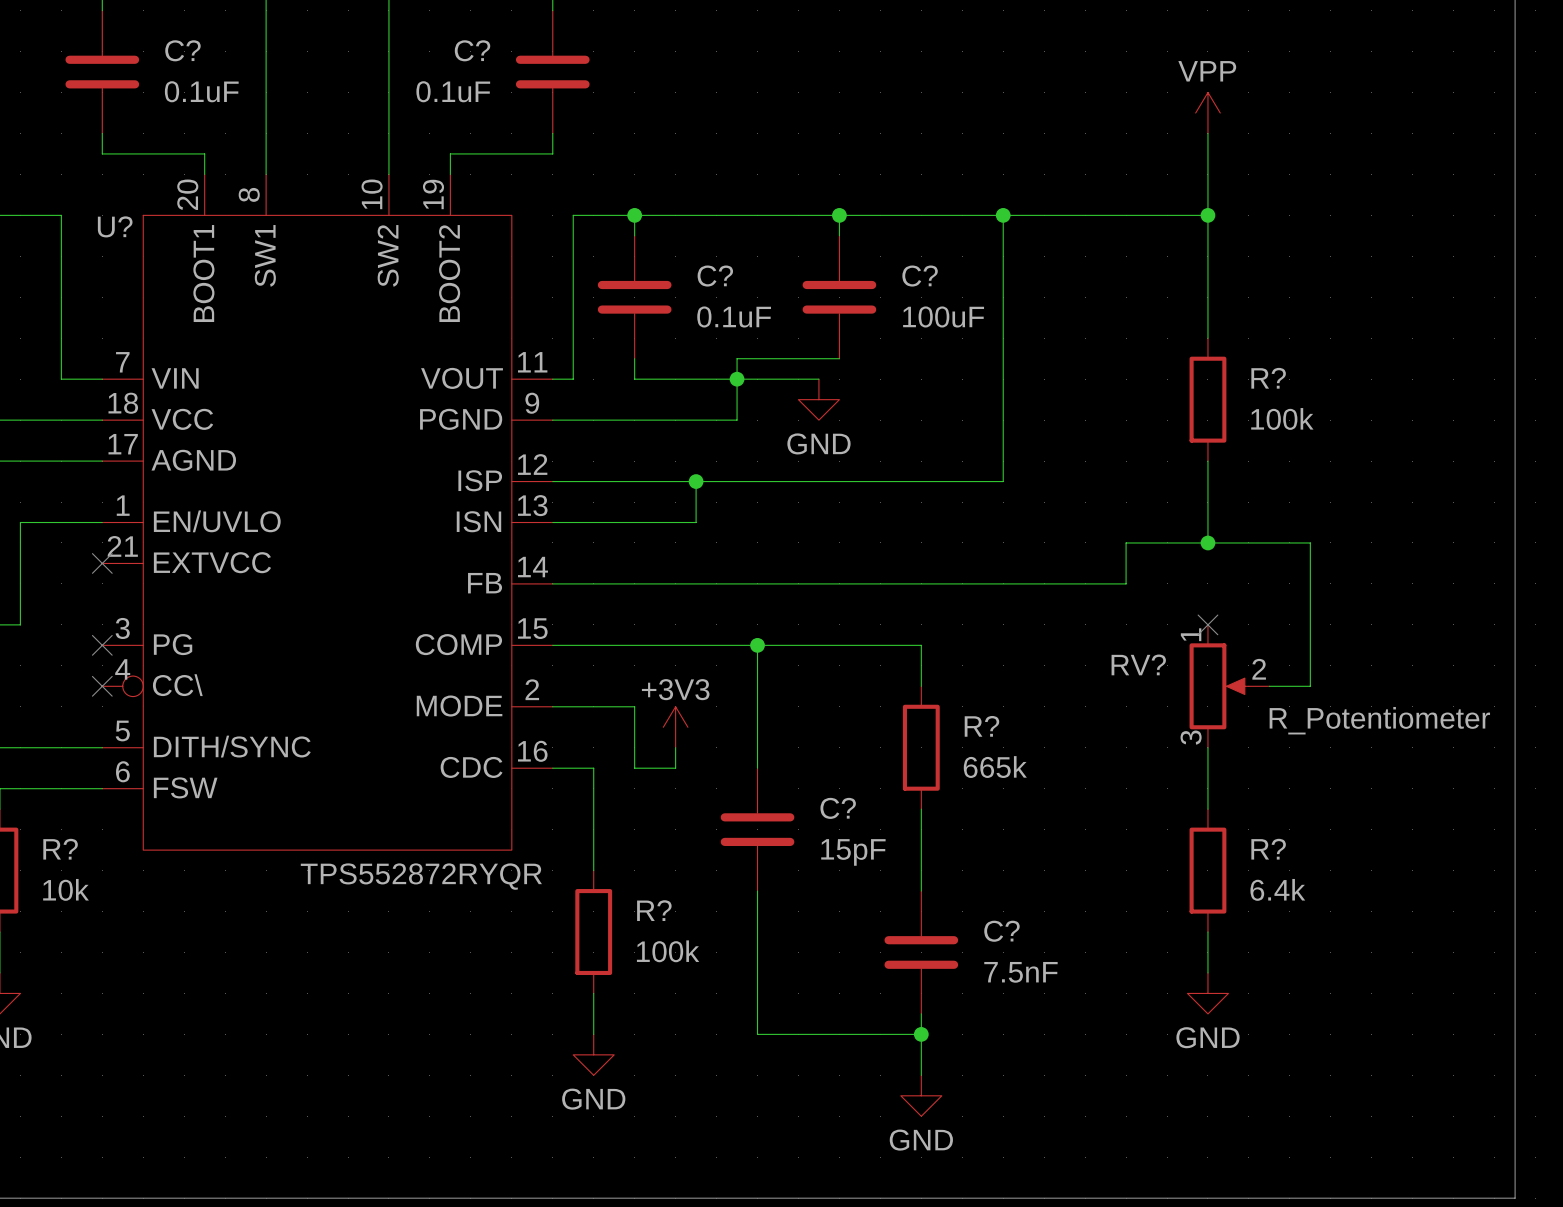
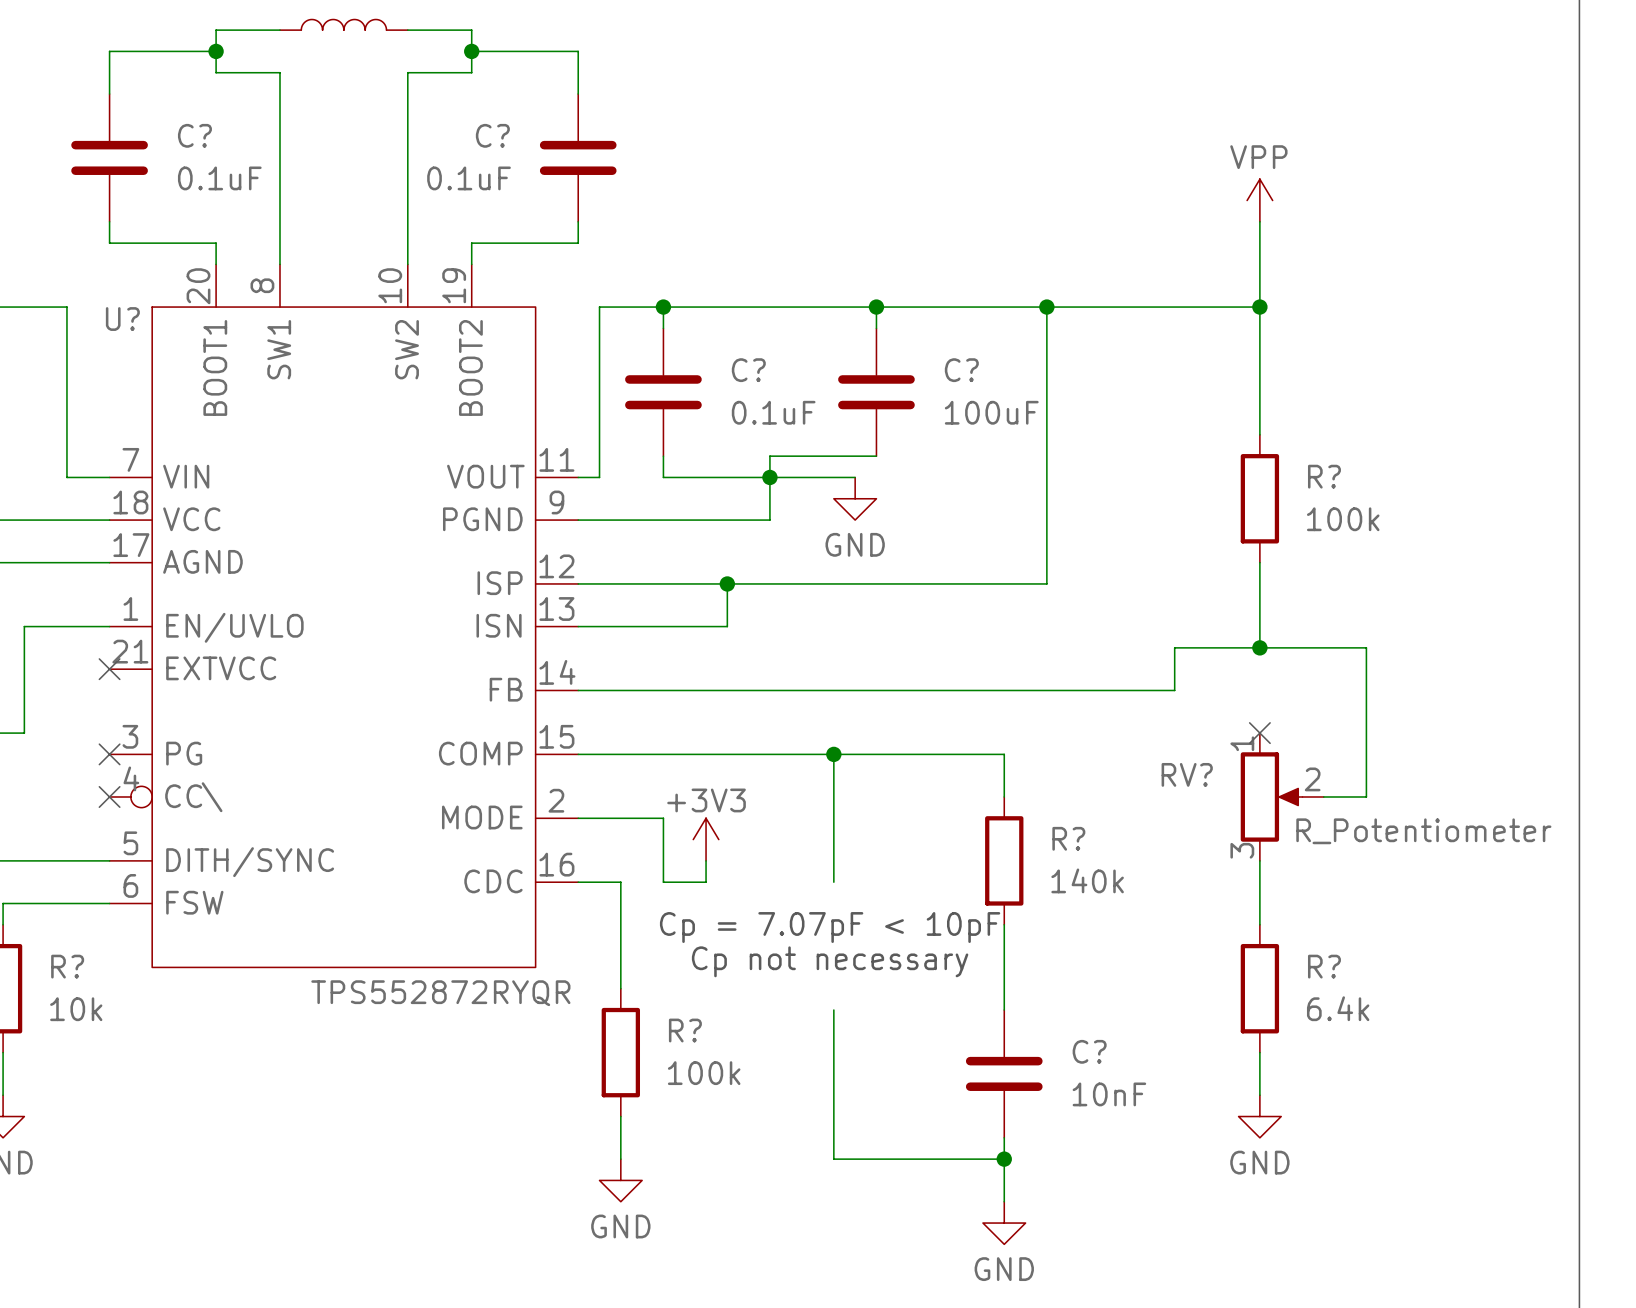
wire: (757, 645) (757, 768) -> (833, 754) (833, 882)
junction position: (757, 645) -> (833, 754)
wire: (921, 645) (921, 686) -> (961, 754) (1004, 754) (1004, 796)
R?: 665k (921, 747) -> none
R?: none -> 140k (1004, 860)
wire: (921, 809) (921, 891) -> (1004, 924) (1004, 1010)
text: none -> Cp = 7.07pF < 10pF (830, 927)
C?: 15pF (757, 829) -> none
text: none -> Cp not necessary (830, 961)
wire: (757, 891) (757, 1034) (798, 1034) -> (833, 1010) (833, 1159)
C?: 7.5nF (921, 952) -> none
C?: none -> 10nF (1004, 1073)
wire: (921, 1013) (921, 1075) -> (1004, 1137) (1004, 1201)
wire: none -> (961, 1159) (1004, 1159)
junction position: (921, 1034) -> (1004, 1159)
power symbol position: GND (921, 1095) -> GND (1004, 1223)

